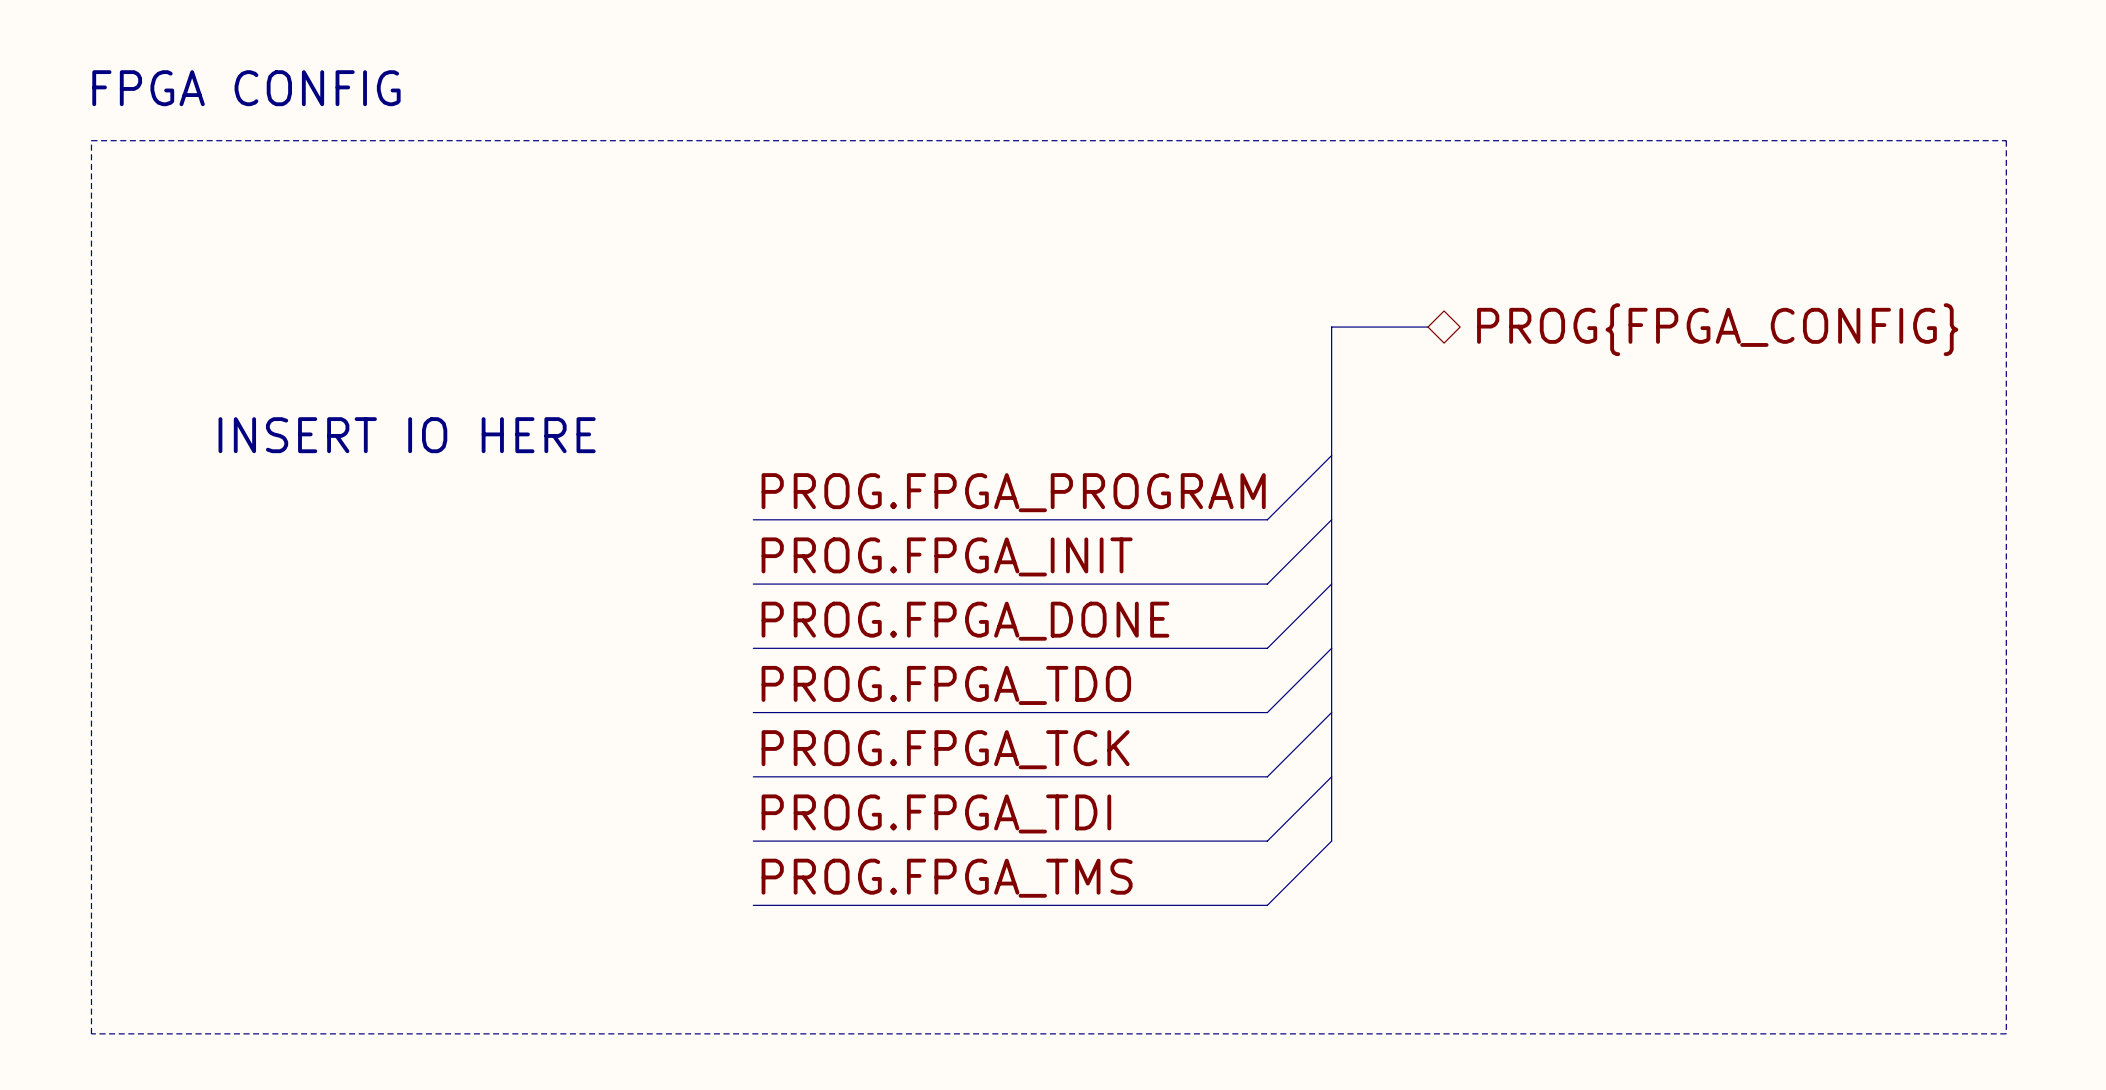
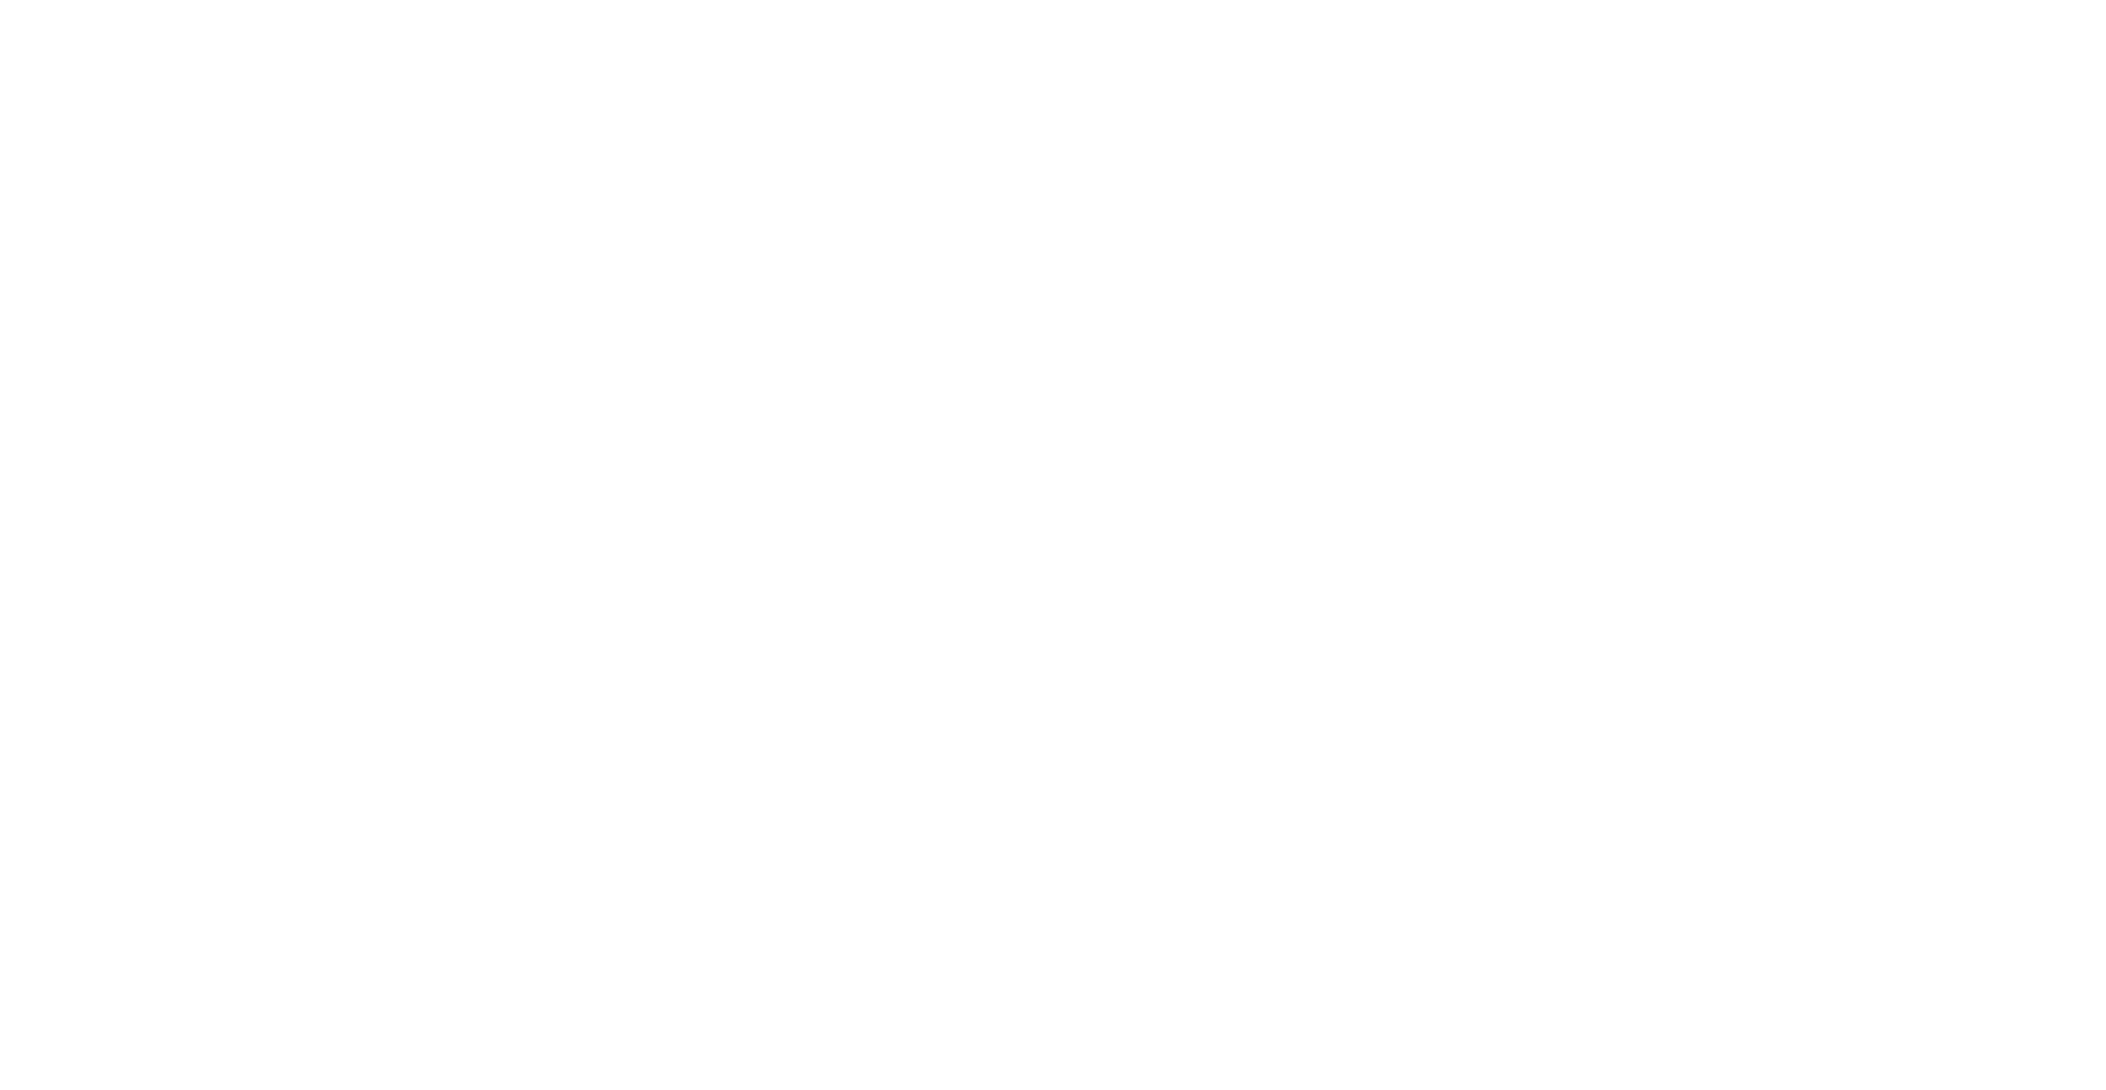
text: FPGA CONFIG (246, 88) -> none
line: (91, 140) (2006, 140) (2006, 1033) (91, 1033) (91, 140) -> none
bus: (1428, 327) (1331, 327) (1331, 841) -> none
hierarchical label: PROG{FPGA_CONFIG} (1717, 329) -> none
text: INSERT IO HERE (407, 435) -> none
wire: (1331, 455) (1267, 519) (753, 519) -> none
label: PROG.FPGA_PROGRAM (1013, 492) -> none
wire: (1331, 519) (1267, 584) (753, 584) -> none
label: PROG.FPGA_INIT (947, 556) -> none
wire: (1331, 584) (1267, 648) (753, 648) -> none
label: PROG.FPGA_DONE (965, 621) -> none
wire: (1331, 648) (1267, 712) (753, 712) -> none
label: PROG.FPGA_TDO (946, 685) -> none
wire: (1331, 712) (1267, 776) (753, 776) -> none
label: PROG.FPGA_TCK (945, 749) -> none
wire: (1331, 776) (1267, 841) (753, 841) -> none
label: PROG.FPGA_TDI (936, 813) -> none
wire: (1331, 841) (1267, 905) (753, 905) -> none
label: PROG.FPGA_TMS (947, 878) -> none

